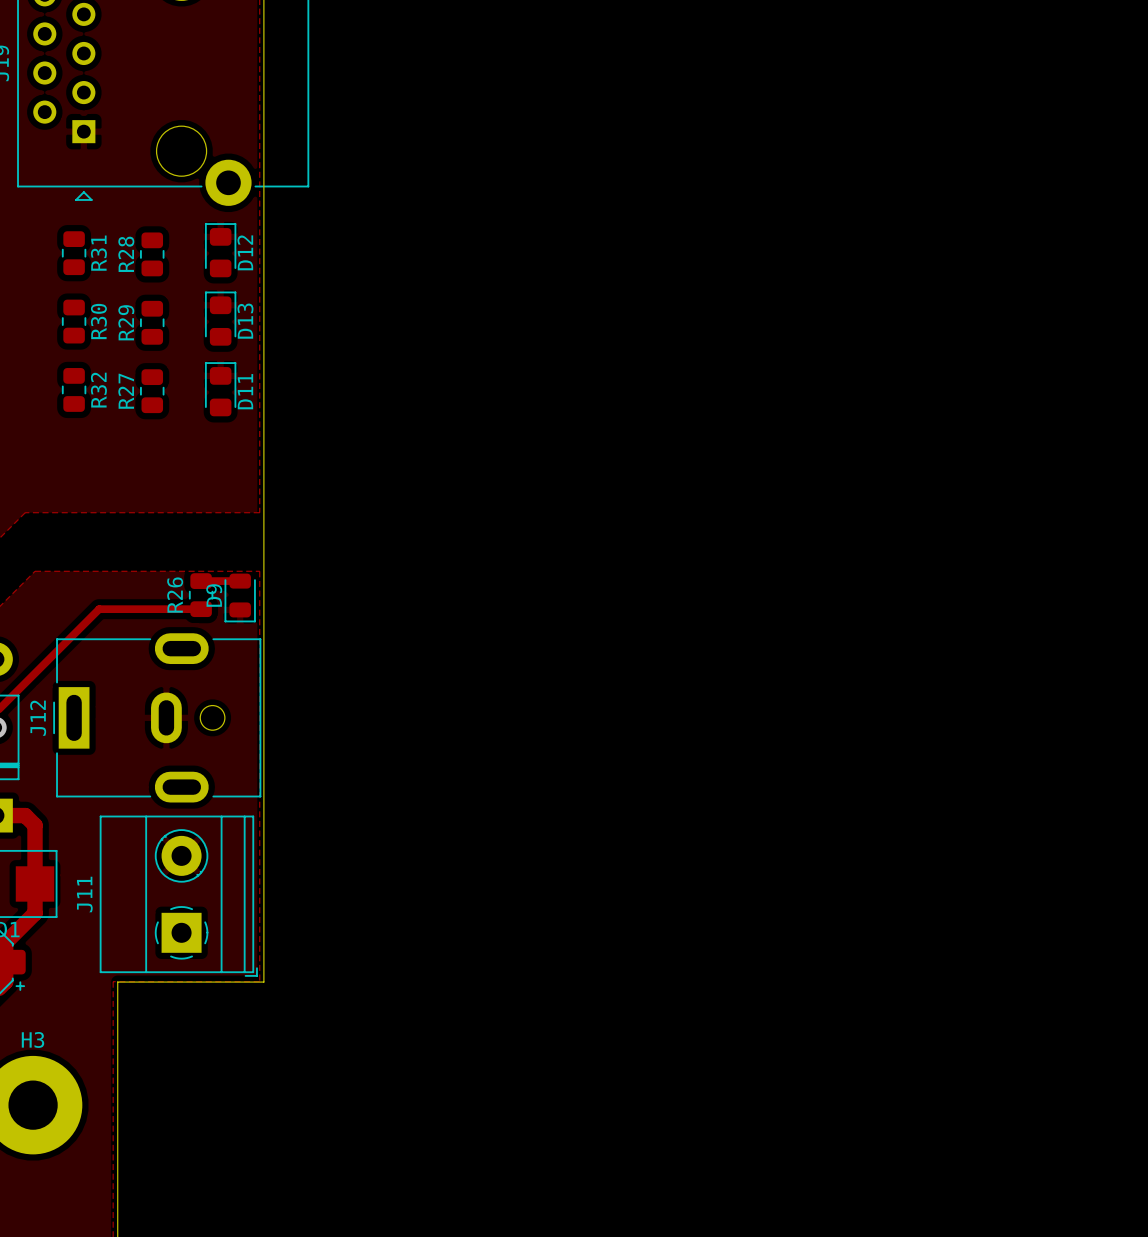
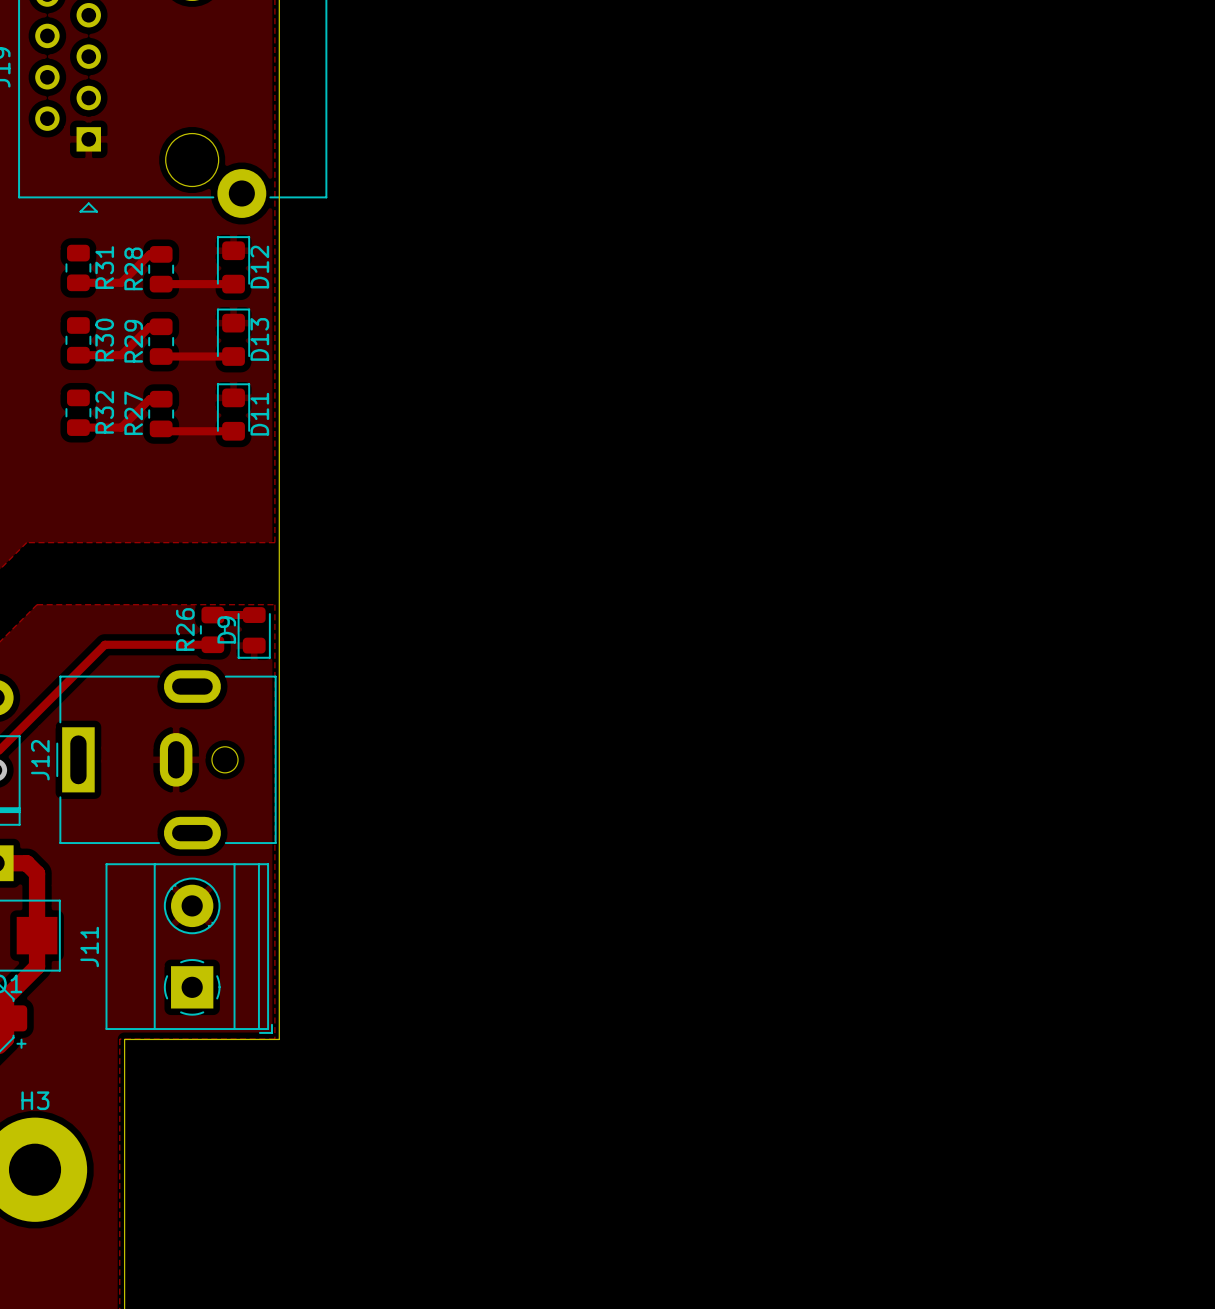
track: none -> (161, 254) (149, 254) (121, 282) (78, 282)
track: none -> (161, 284) (233, 284)
track: none -> (161, 326) (149, 326) (121, 355) (78, 355)
track: none -> (161, 356) (233, 356)
track: none -> (161, 399) (149, 399) (121, 427) (78, 427)
track: none -> (161, 428) (163, 431) (233, 431)

